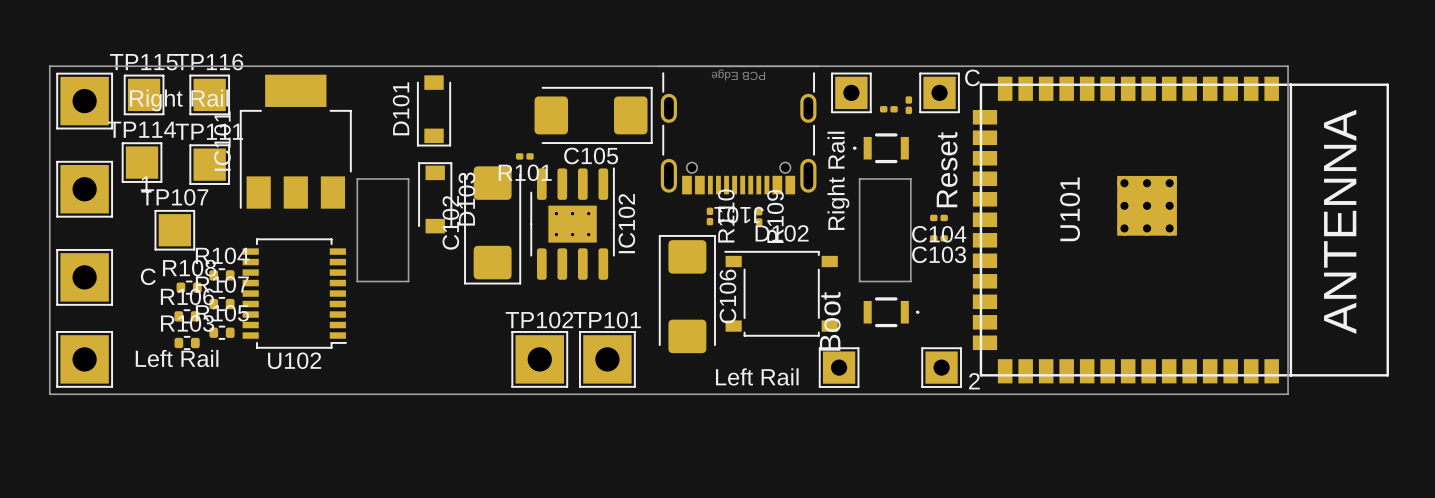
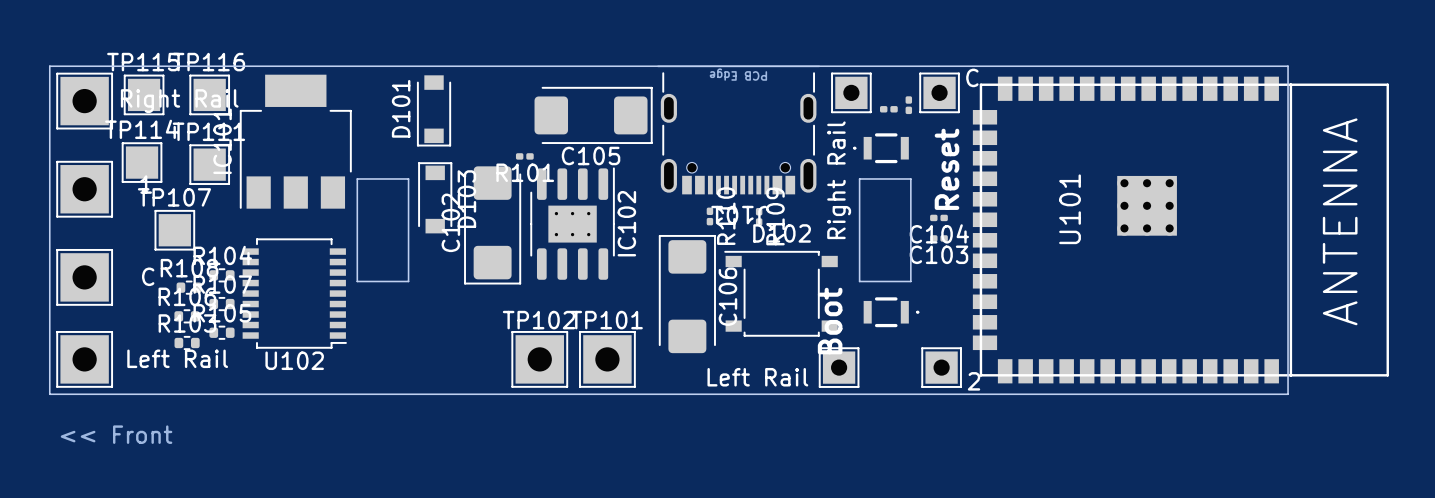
text: none -> << Front (116, 434)

